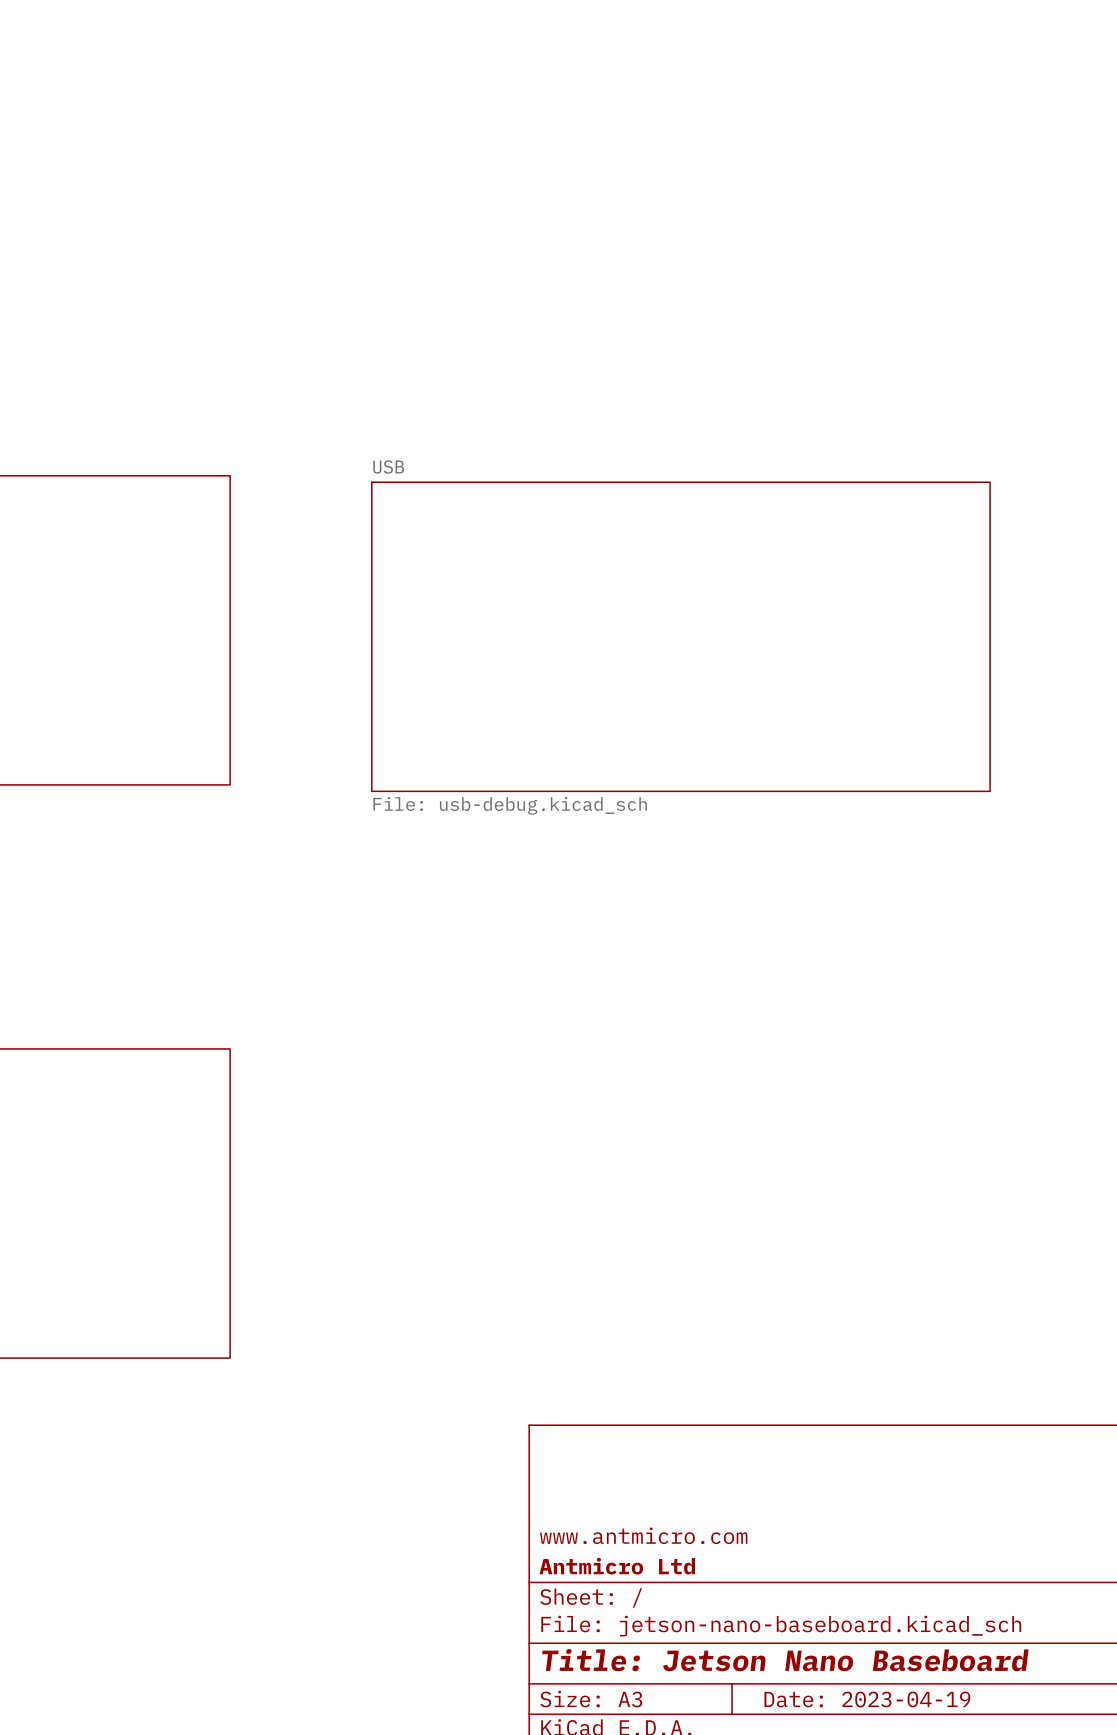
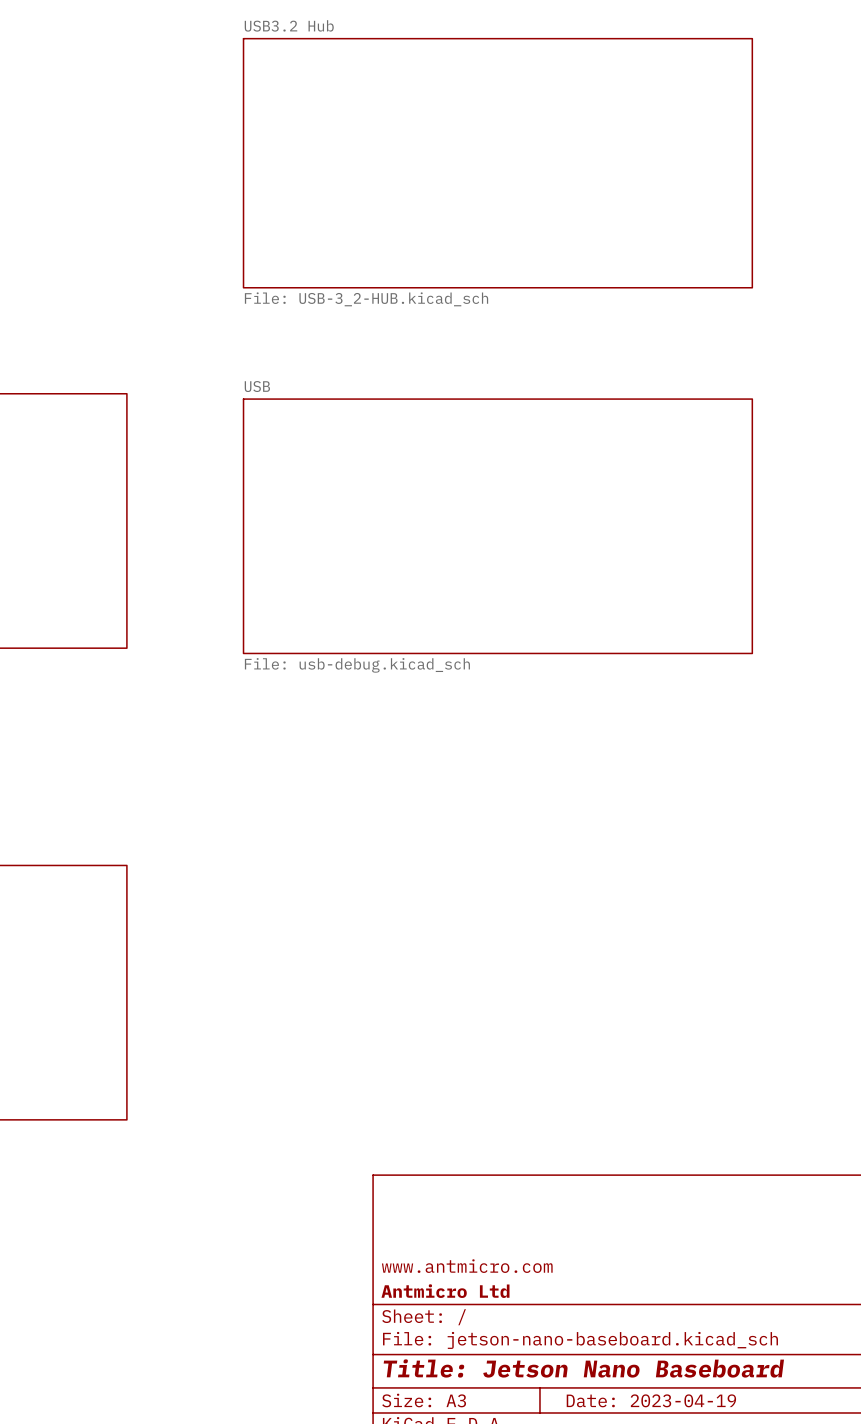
sheet USB3.2 Hub: none -> File: USB-3_2-HUB.kicad_sch (497, 163)

